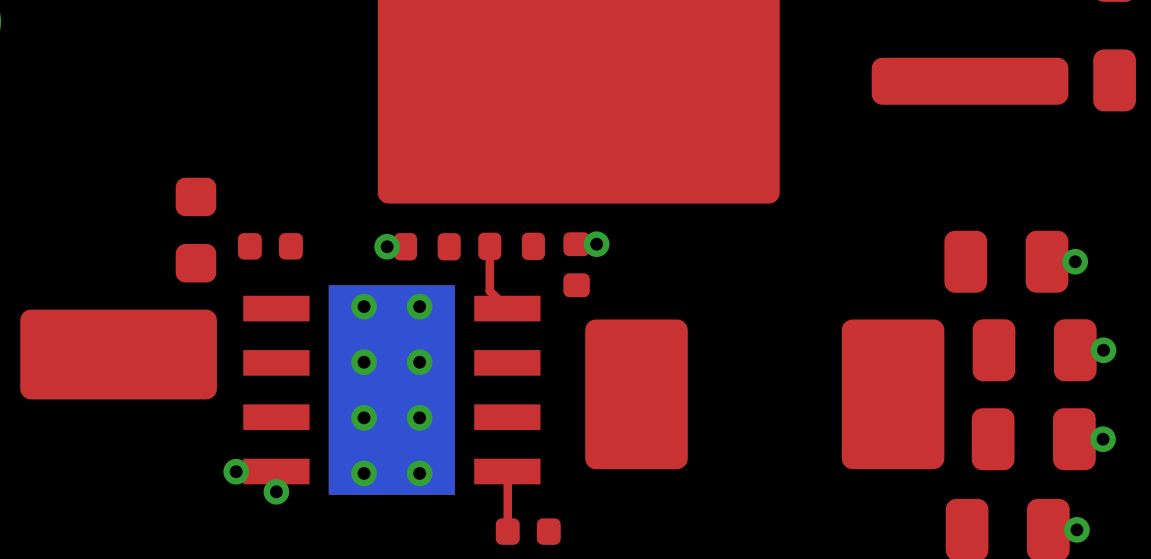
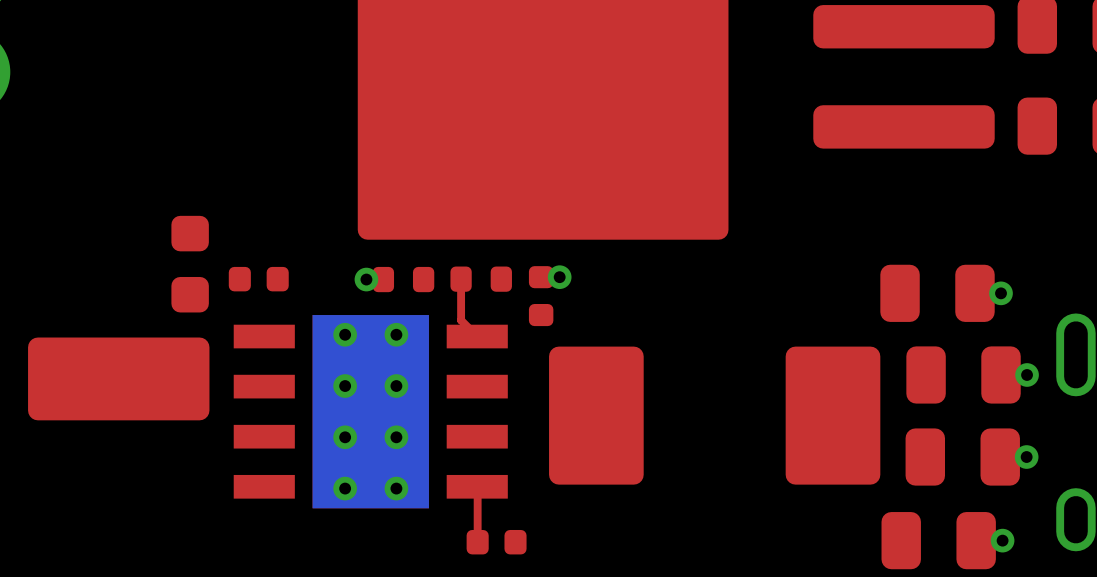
via: (236, 471) -> none
via: (276, 491) -> none

